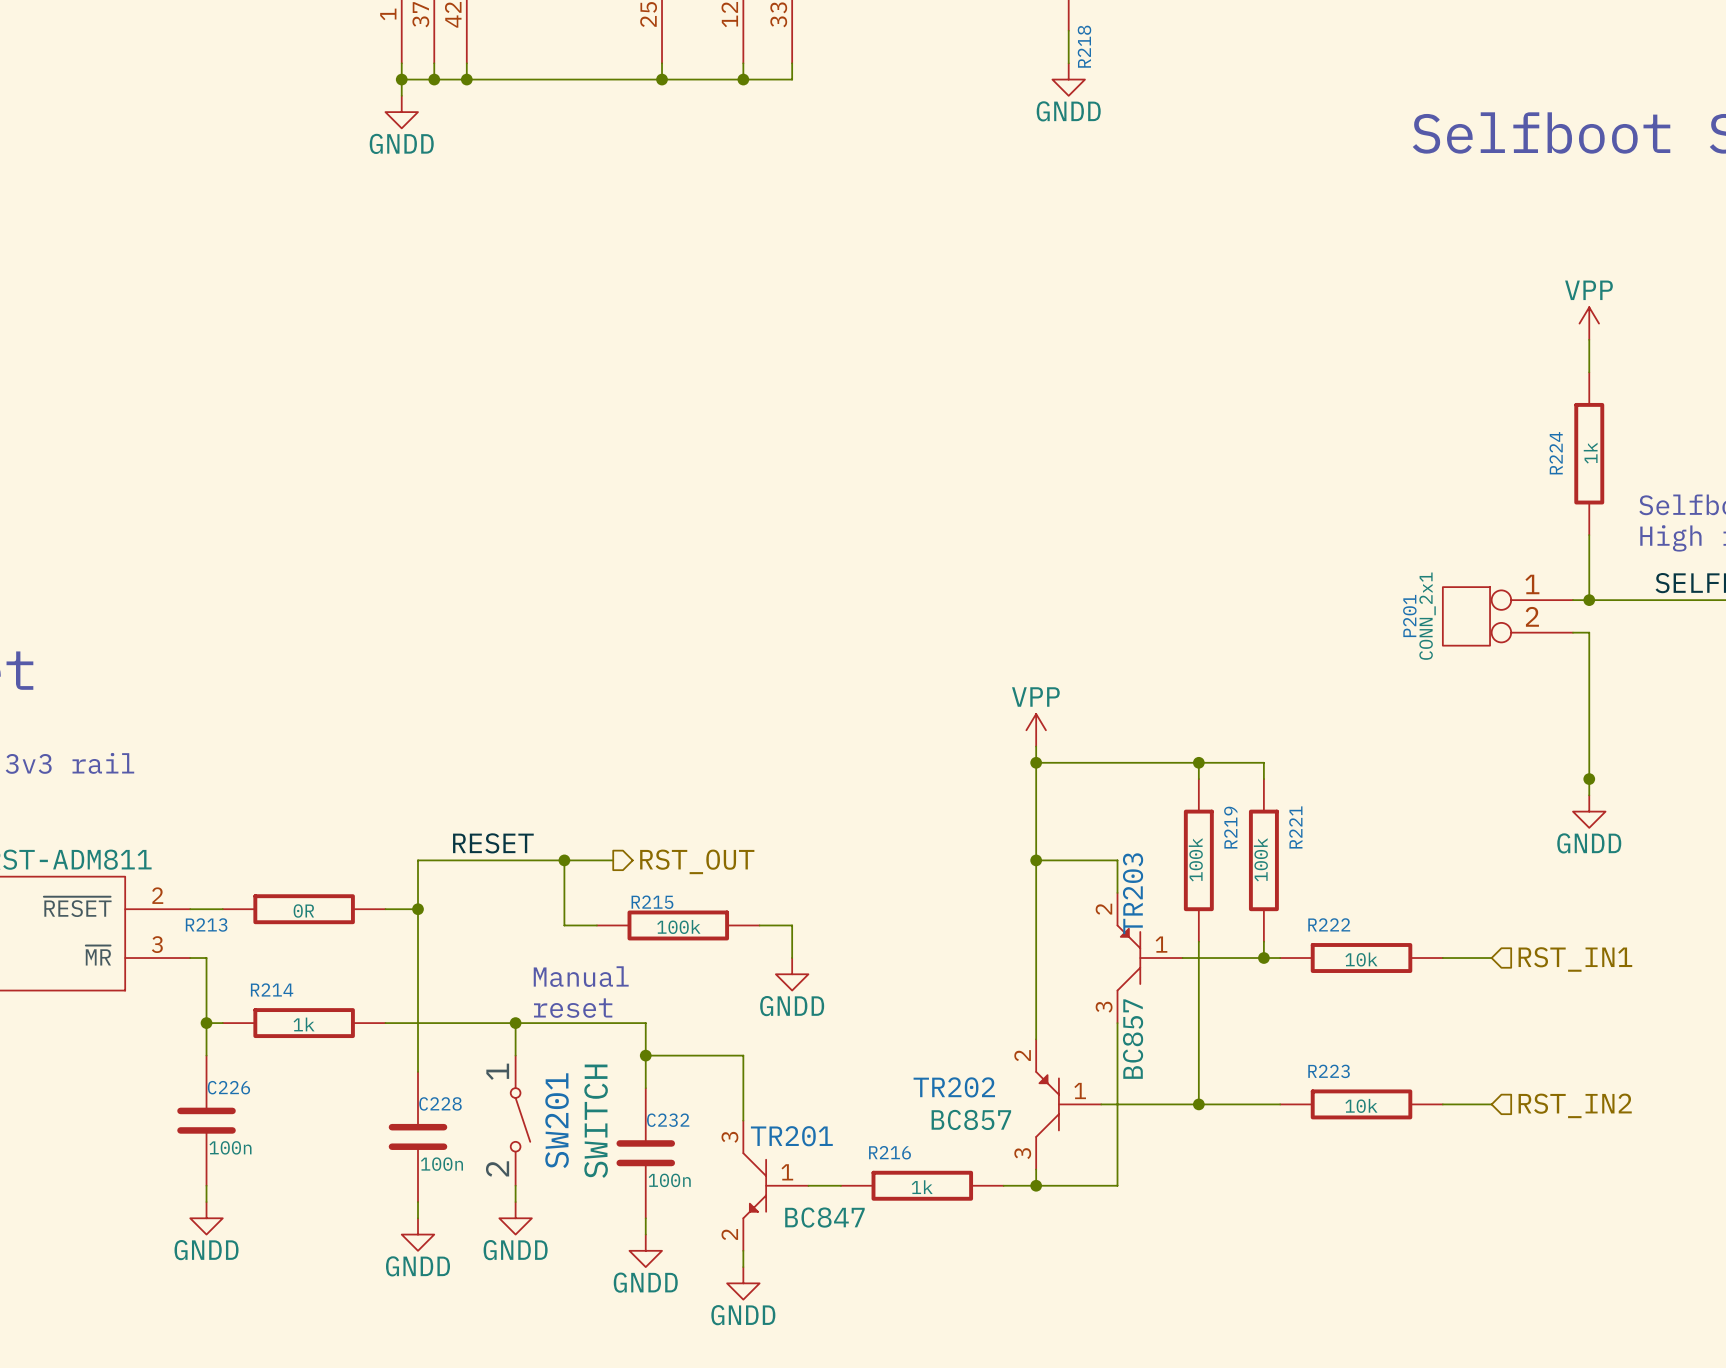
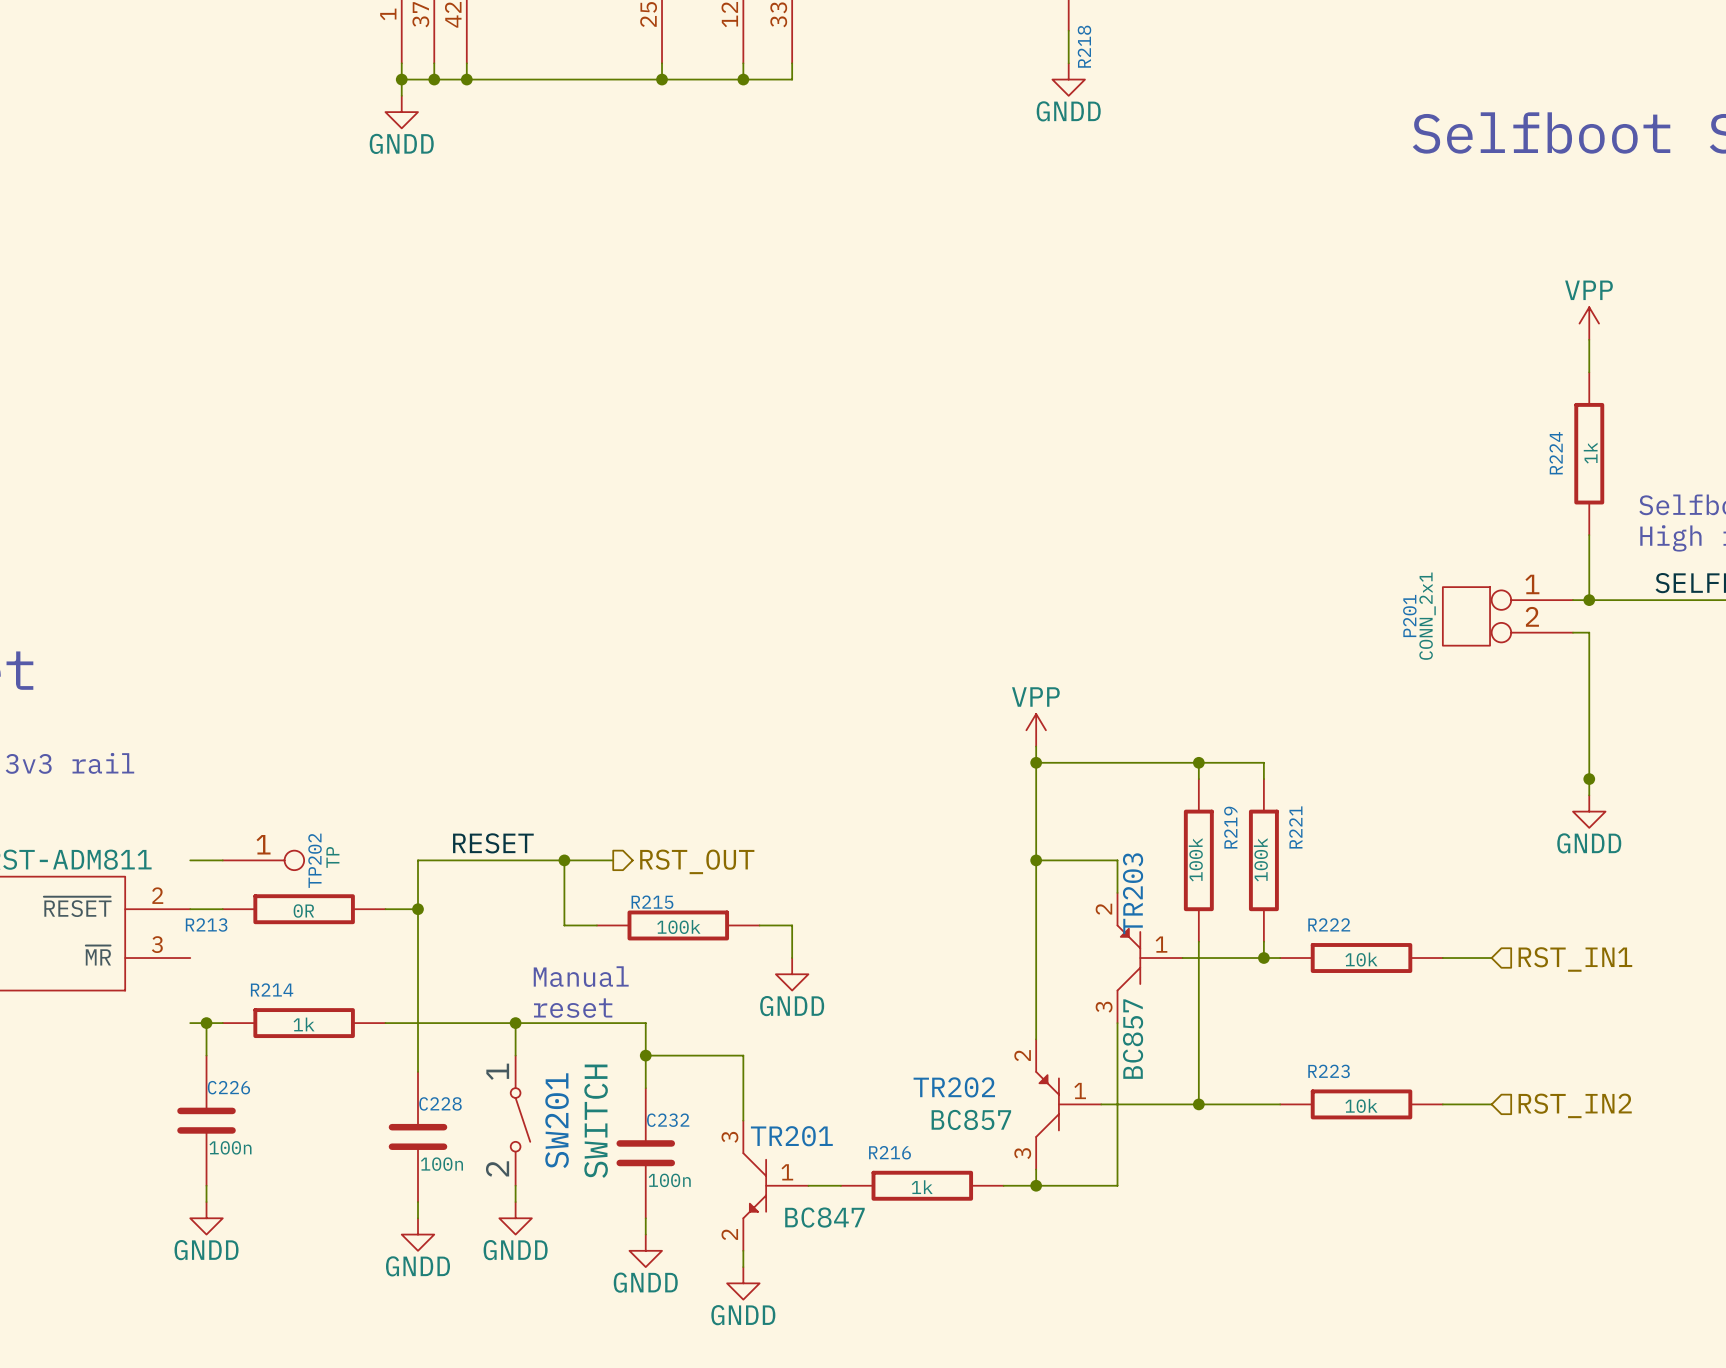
wire: none -> (190, 860) (222, 860)
TP202: none -> TP (263, 860)
wire: (190, 958) (206, 958) (206, 1023) -> (190, 1023) (206, 1023)

